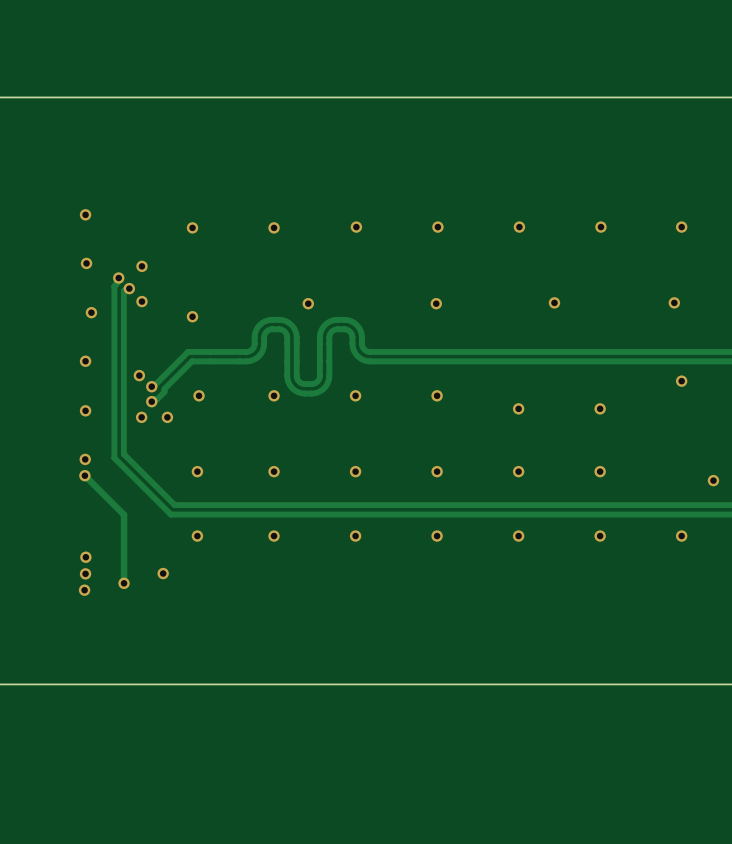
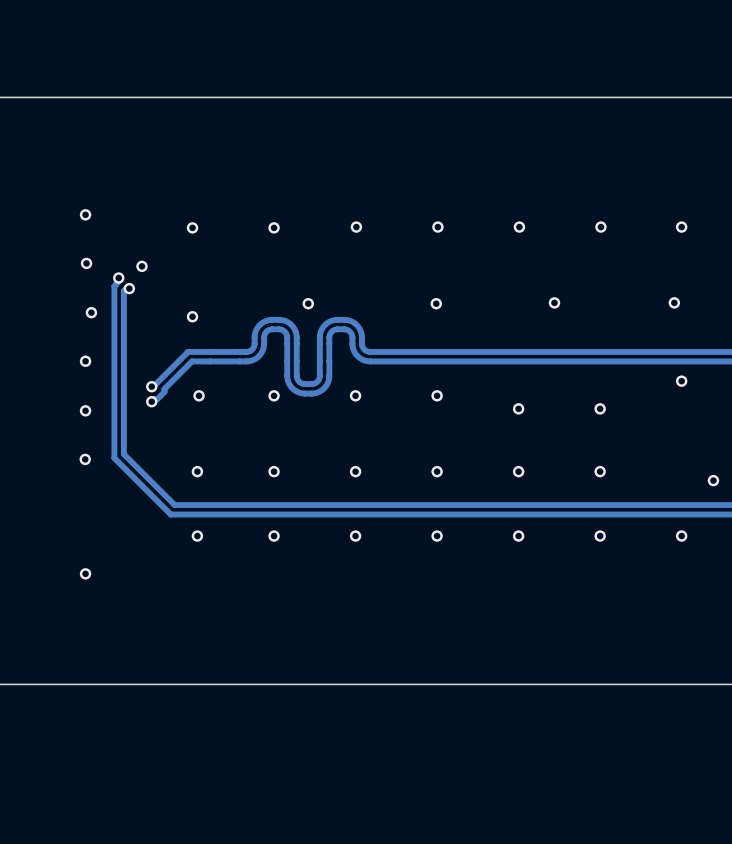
via: (141, 301) -> none
via: (139, 375) -> none
via: (141, 417) -> none
via: (167, 417) -> none
track: (84, 475) (124, 514) (124, 583) -> none
via: (84, 475) -> none
via: (85, 557) -> none
via: (163, 573) -> none
via: (124, 583) -> none
via: (84, 590) -> none

